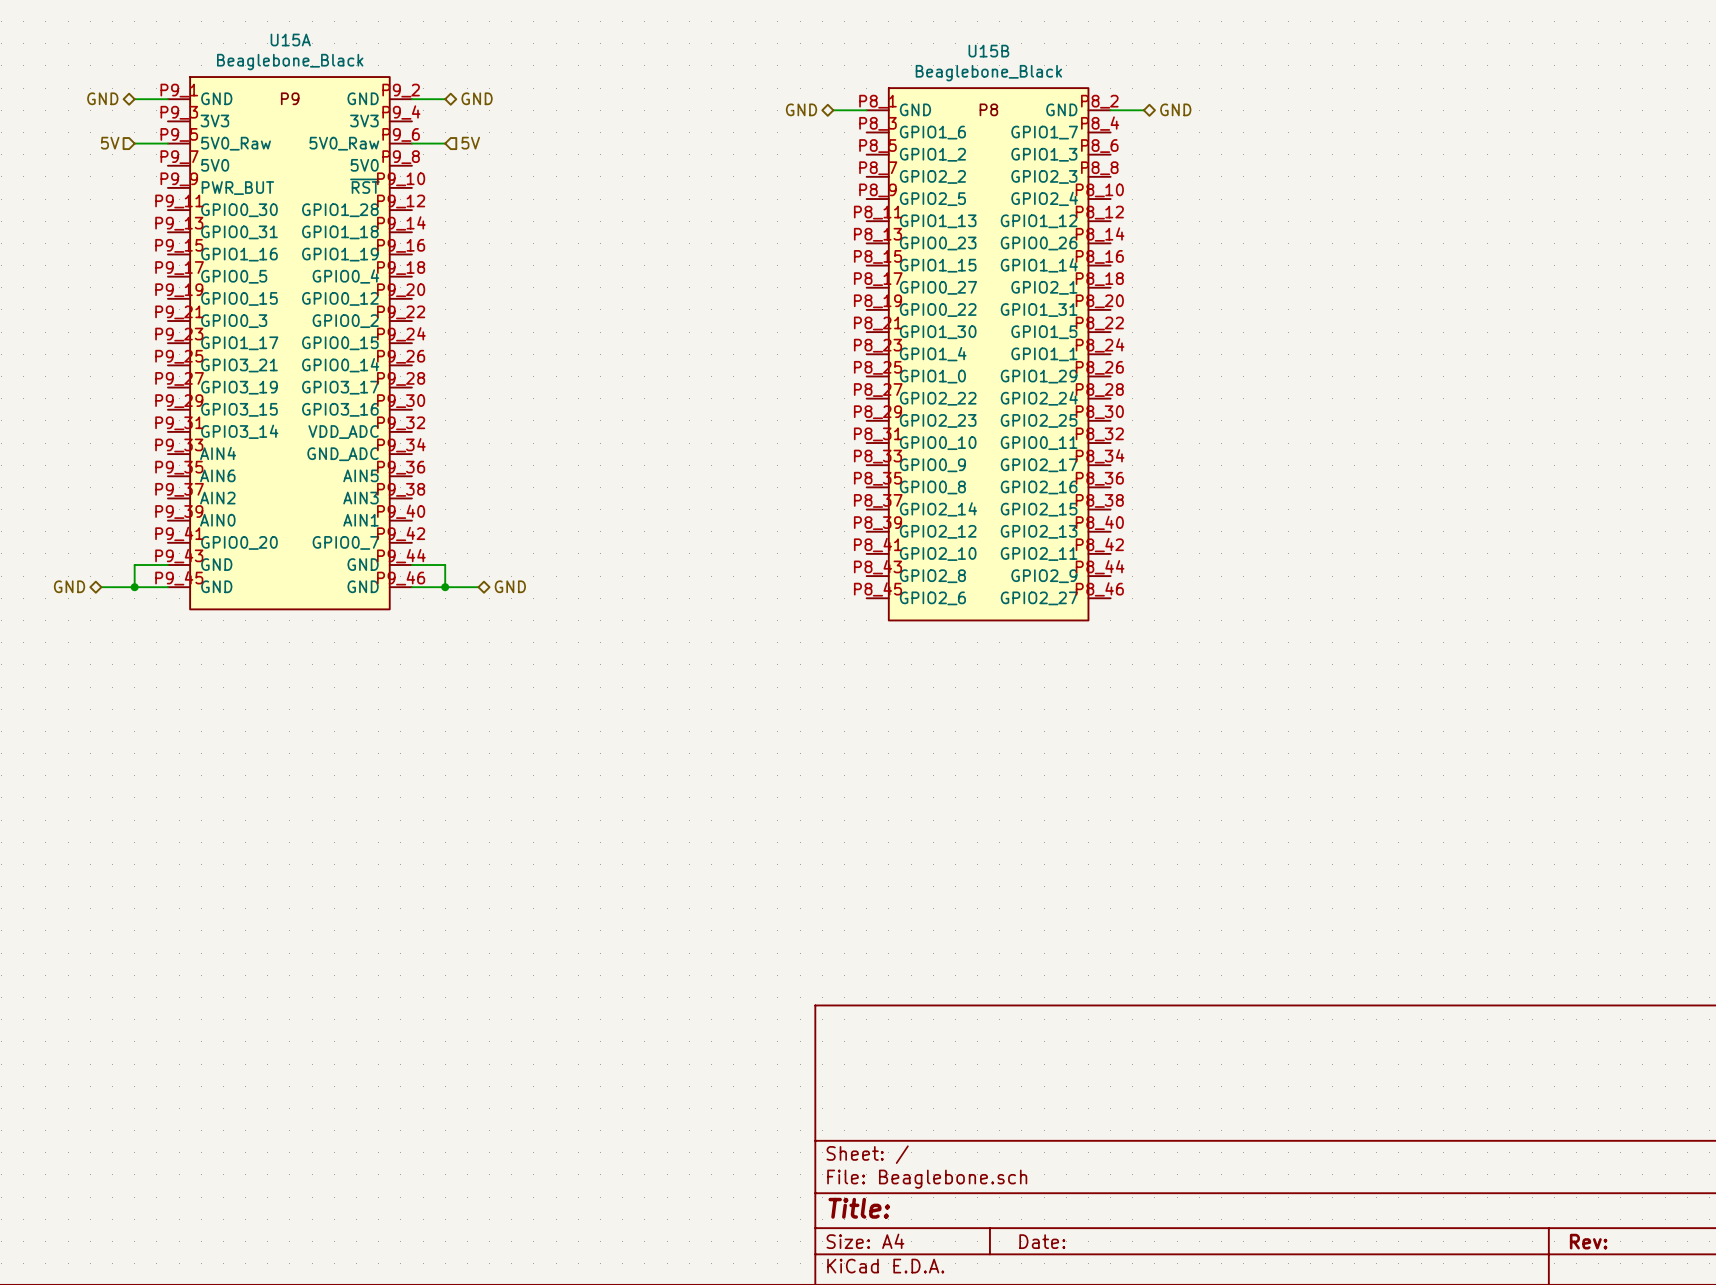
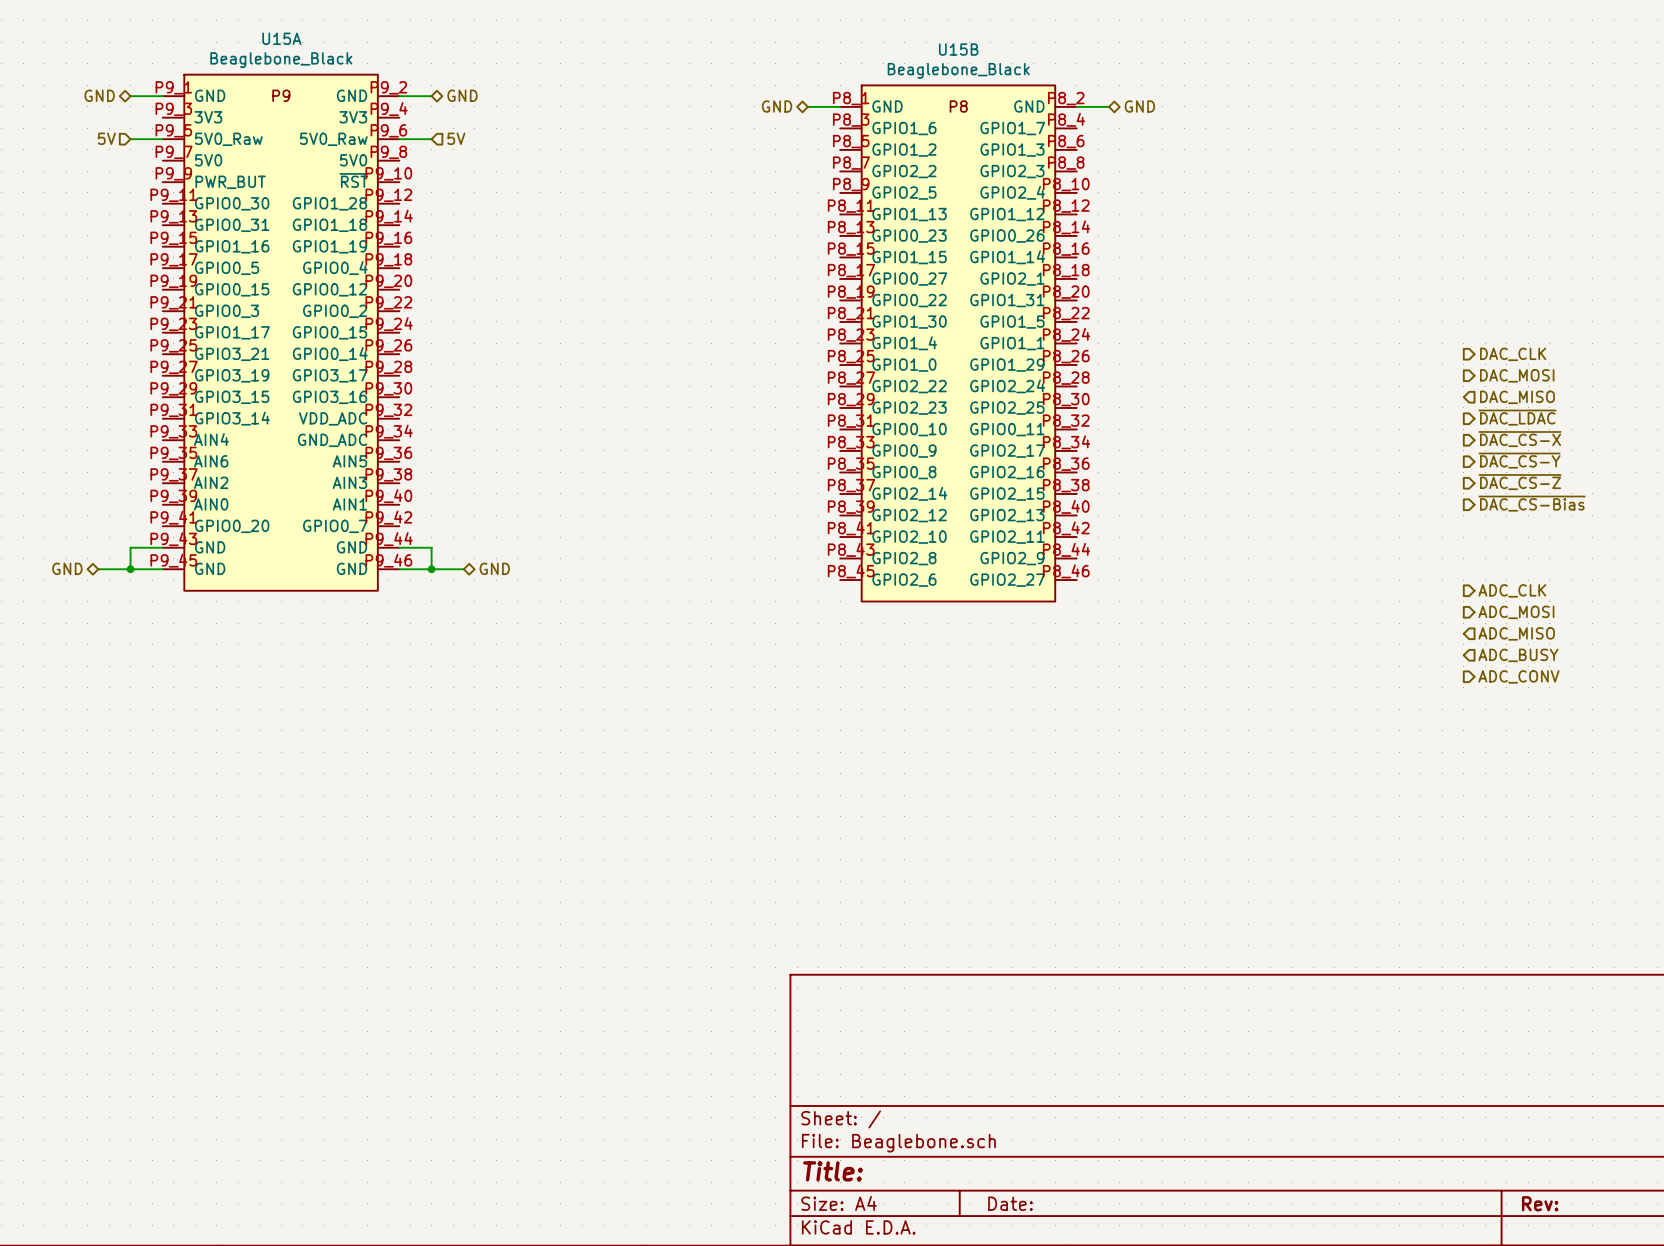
hierarchical label: none -> DAC_CLK (1513, 354)
hierarchical label: none -> DAC_MOSI (1517, 375)
hierarchical label: none -> DAC_MISO (1517, 397)
hierarchical label: none -> ~{DAC_LDAC} (1517, 417)
hierarchical label: none -> ~{DAC_CS-X} (1520, 439)
hierarchical label: none -> ~{DAC_CS-Y} (1519, 460)
hierarchical label: none -> ~{DAC_CS-Z} (1520, 482)
hierarchical label: none -> ~{DAC_CS-Bias} (1532, 503)
hierarchical label: none -> ADC_CLK (1512, 590)
hierarchical label: none -> ADC_MOSI (1516, 612)
hierarchical label: none -> ADC_MISO (1516, 633)
hierarchical label: none -> ADC_BUSY (1518, 655)
hierarchical label: none -> ADC_CONV (1519, 676)

